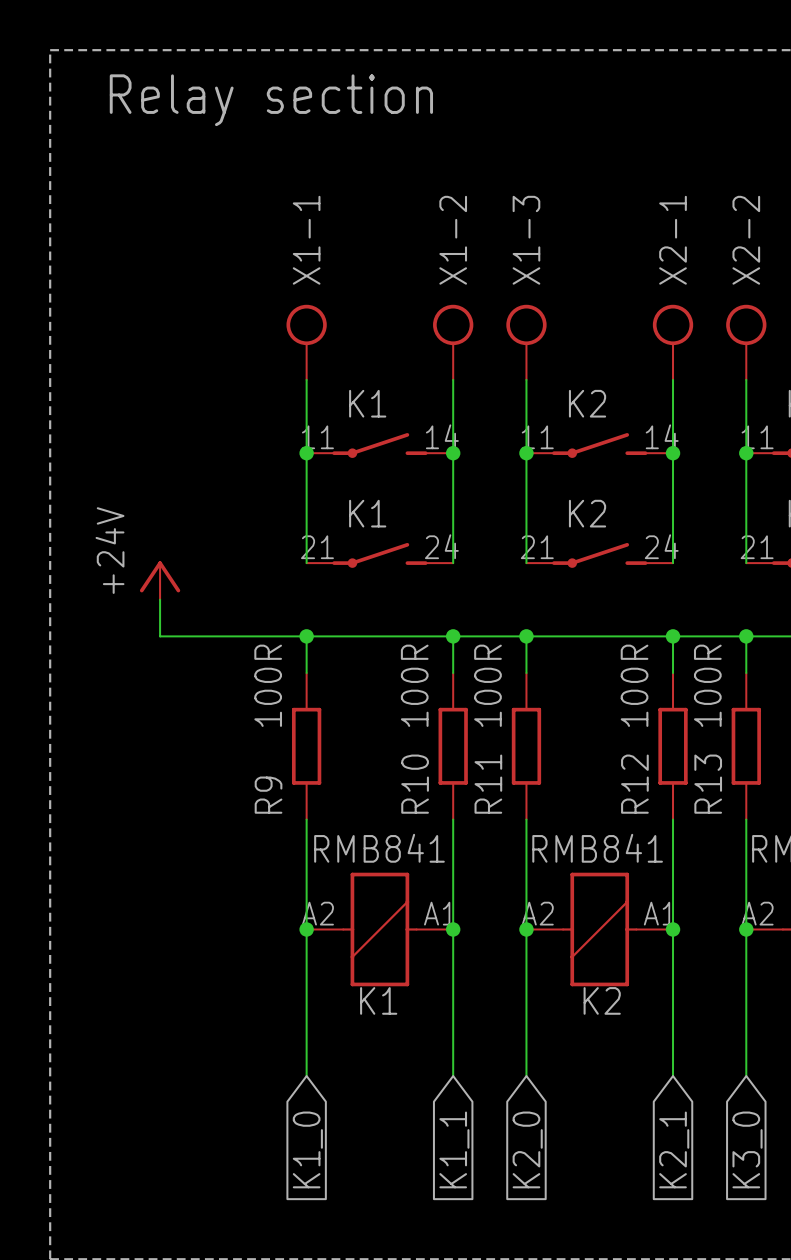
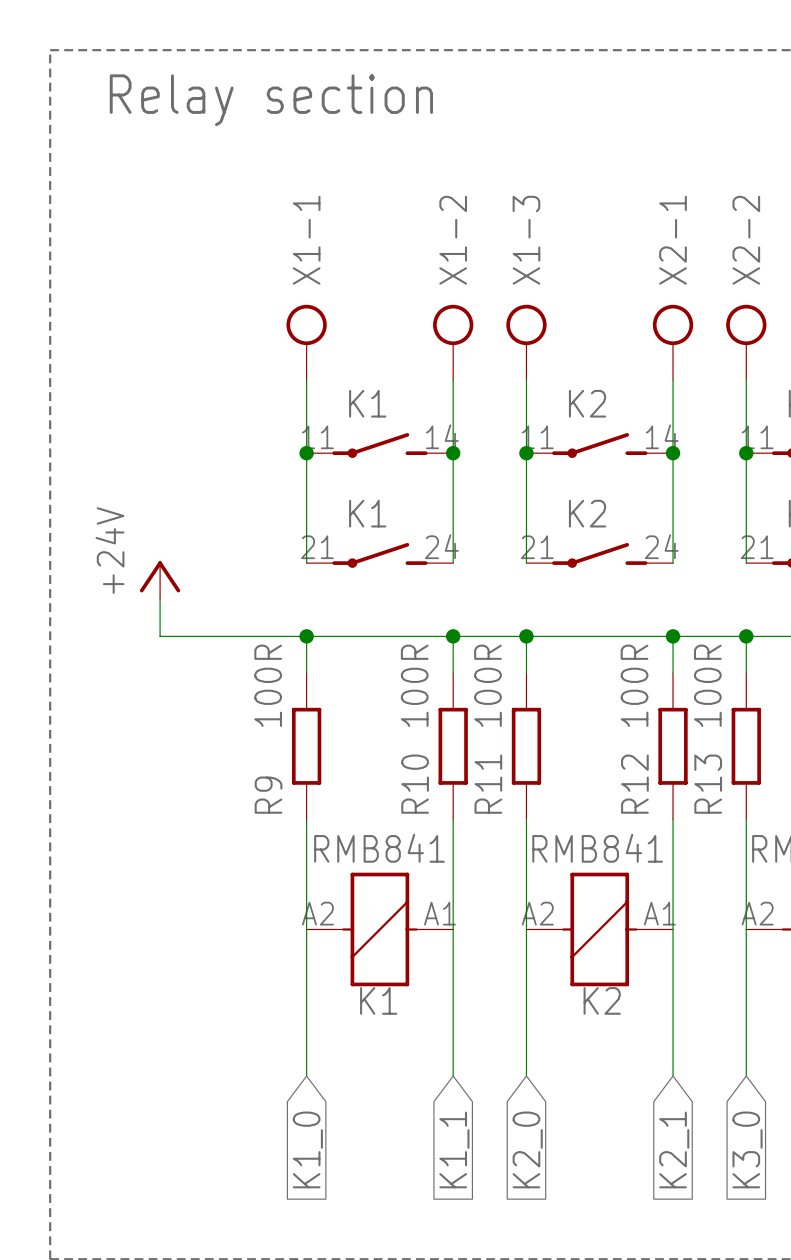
junction: (306, 929) -> none
junction: (453, 929) -> none
junction: (526, 929) -> none
junction: (673, 929) -> none
junction: (746, 929) -> none

